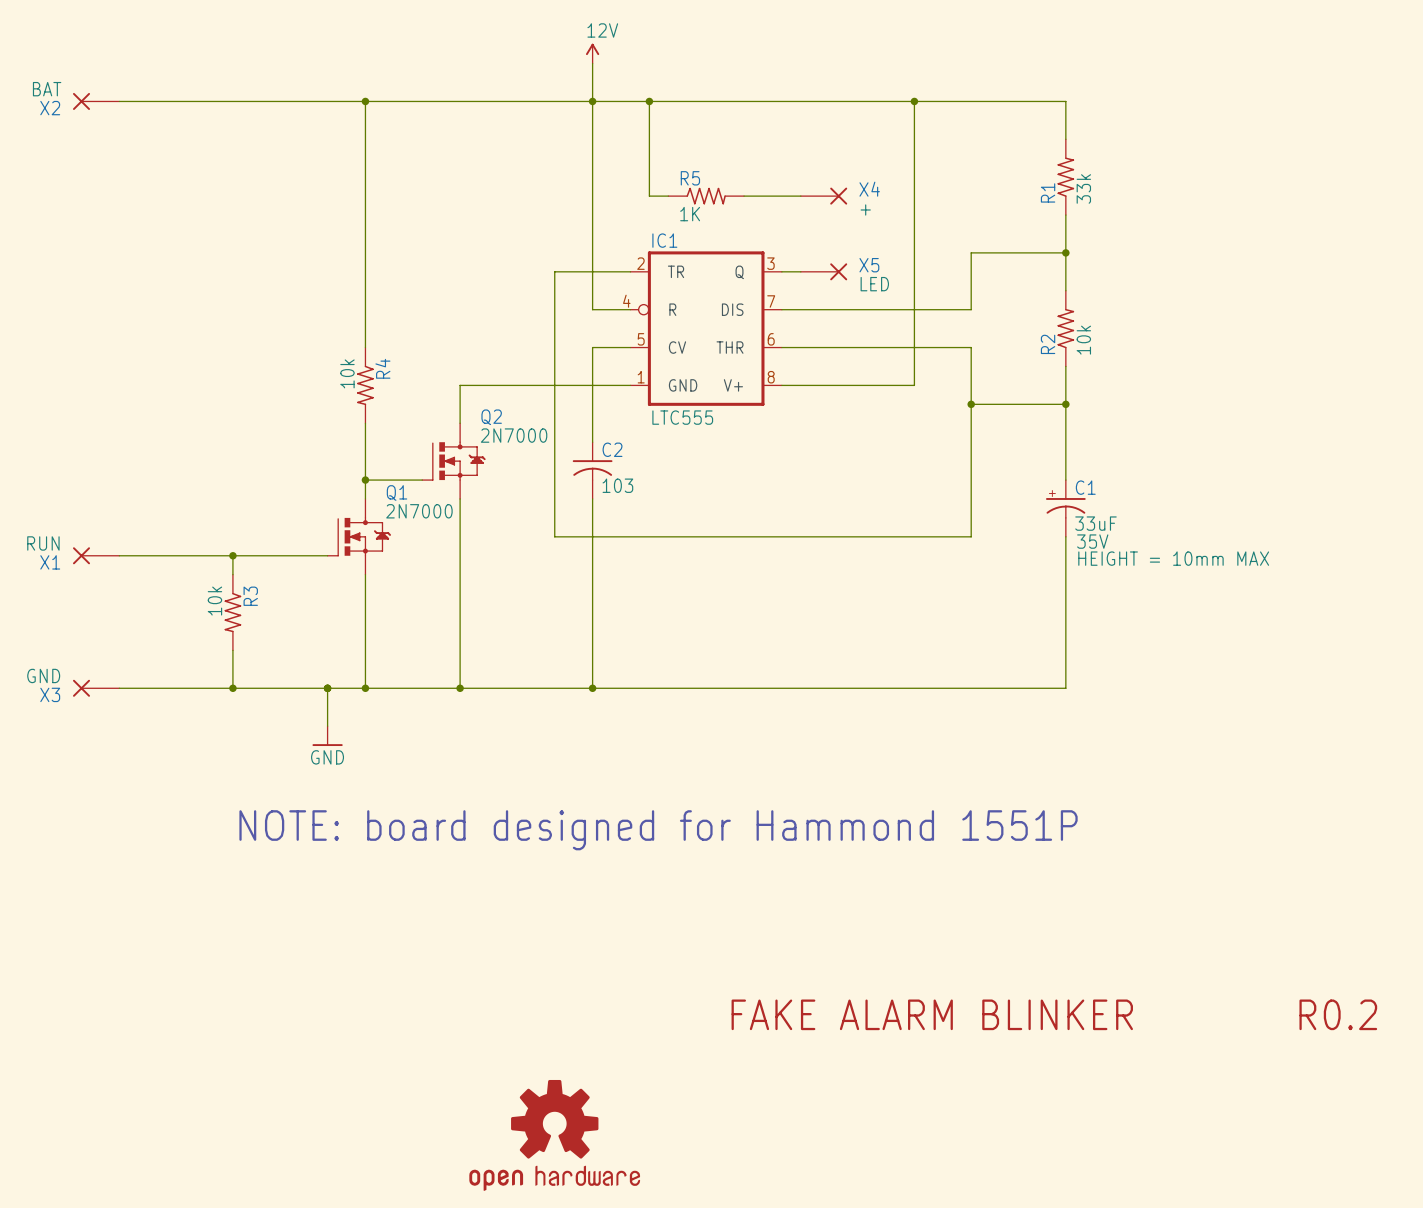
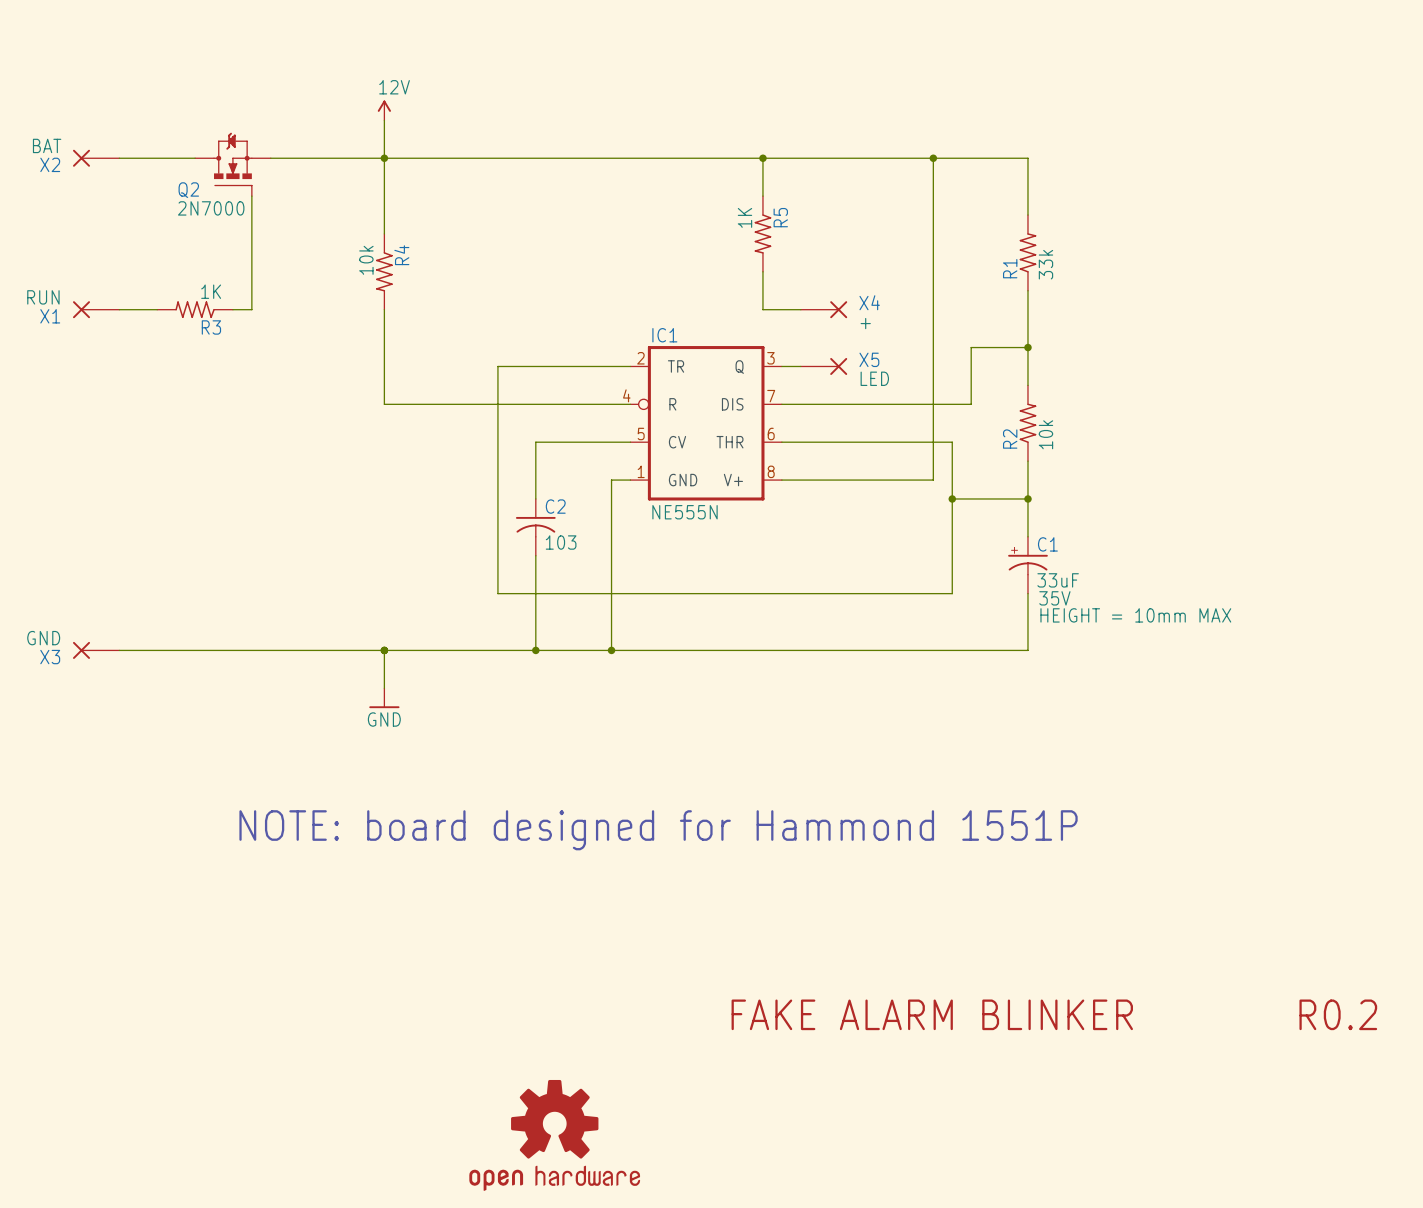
power symbol: 12V (592, 53) -> none
wire: (592, 63) (592, 309) (630, 309) -> none
X2 position: (96, 101) -> (96, 158)
wire: (119, 101) (1065, 101) (1065, 139) -> none
wire: (365, 101) (365, 347) -> none
junction: (365, 101) -> none
junction: (592, 101) -> none
wire: (649, 101) (649, 196) (668, 196) -> none
junction: (649, 101) -> none
wire: (914, 101) (914, 385) (781, 385) -> none
junction: (914, 101) -> none
power symbol: none -> 12V (384, 110)
wire: none -> (384, 120) (384, 233)
wire: none -> (119, 158) (195, 158)
wire: none -> (270, 158) (1027, 158) (1027, 215)
junction: none -> (384, 158)
wire: none -> (762, 158) (762, 196)
junction: none -> (762, 158)
wire: none -> (933, 158) (933, 480) (781, 480)
junction: none -> (933, 158)
R1 position: (1065, 177) -> (1027, 252)
wire: none -> (251, 196) (251, 309) (232, 309)
R5 rotation: 0° (706, 196) -> 90° clockwise (762, 233)
R5 position: (706, 196) -> (762, 233)
wire: (744, 196) (800, 196) -> none
X4 position: (824, 196) -> (824, 309)
wire: (1065, 215) (1065, 290) -> none
wire: (1065, 252) (971, 252) (971, 309) (800, 309) -> none
junction: (1065, 252) -> none
wire: (630, 271) (554, 271) (554, 536) (971, 536) (971, 404) (1065, 404) -> none
wire: (781, 271) (800, 271) -> (781, 366) (800, 366)
X5 position: (824, 271) -> (824, 366)
wire: none -> (1027, 290) (1027, 385)
wire: none -> (119, 309) (157, 309)
wire: none -> (384, 309) (384, 404) (630, 404)
IC1 position: (706, 328) -> (706, 423)
R2 position: (1065, 328) -> (1027, 423)
wire: (630, 347) (592, 347) (592, 442) -> none
wire: (781, 347) (971, 347) -> (1027, 347) (971, 347)
junction: none -> (1027, 347)
wire: none -> (630, 366) (497, 366) (497, 593) (952, 593) (952, 442) (781, 442)
wire: (1065, 366) (1065, 480) -> none
R4 position: (365, 385) -> (384, 271)
wire: (630, 385) (460, 385) (460, 423) -> none
wire: none -> (781, 404) (971, 404)
junction: (971, 404) -> none
junction: (1065, 404) -> none
Q2 name position: Q2 (491, 417) -> Q2 (188, 190)
IC1 value: LTC555 (682, 417) -> NE555N (685, 512)
wire: (365, 423) (365, 498) -> none
Q2 value position: 2N7000 (514, 435) -> 2N7000 (211, 208)
wire: none -> (630, 442) (535, 442) (535, 498)
Q2 rotation: 0° (453, 461) -> 90° counterclockwise (232, 164)
Q2 position: (453, 461) -> (232, 164)
wire: none -> (1027, 461) (1027, 536)
C2 position: (592, 470) -> (535, 527)
wire: (365, 480) (422, 480) -> none
junction: (365, 480) -> none
wire: none -> (630, 480) (611, 480) (611, 650)
wire: (460, 498) (460, 688) -> none
wire: (592, 498) (592, 688) -> none
wire: none -> (952, 498) (1027, 498)
junction: none -> (952, 498)
junction: none -> (1027, 498)
C1 position: (1065, 508) -> (1027, 565)
Q1: 2N7000 (359, 536) -> none
wire: (1065, 536) (1065, 688) (119, 688) -> none
X1 position: (96, 555) -> (96, 309)
wire: (119, 555) (327, 555) -> none
wire: (232, 555) (232, 574) -> none
junction: (232, 555) -> none
wire: none -> (535, 555) (535, 650)
wire: (365, 574) (365, 688) -> none
wire: none -> (1027, 593) (1027, 650) (119, 650)
R3 value: 10k (214, 601) -> 1K (211, 291)
R3 rotation: 0° (232, 612) -> 90° clockwise (195, 309)
R3 position: (232, 612) -> (195, 309)
wire: (232, 650) (232, 688) -> none
junction: none -> (384, 650)
junction: none -> (535, 650)
junction: none -> (611, 650)
X3 position: (96, 688) -> (96, 650)
junction: (232, 688) -> none
wire: (327, 688) (327, 726) -> (384, 650) (384, 688)
junction: (327, 688) -> none
junction: (365, 688) -> none
junction: (460, 688) -> none
junction: (592, 688) -> none
power symbol position: GND (327, 736) -> GND (384, 698)

